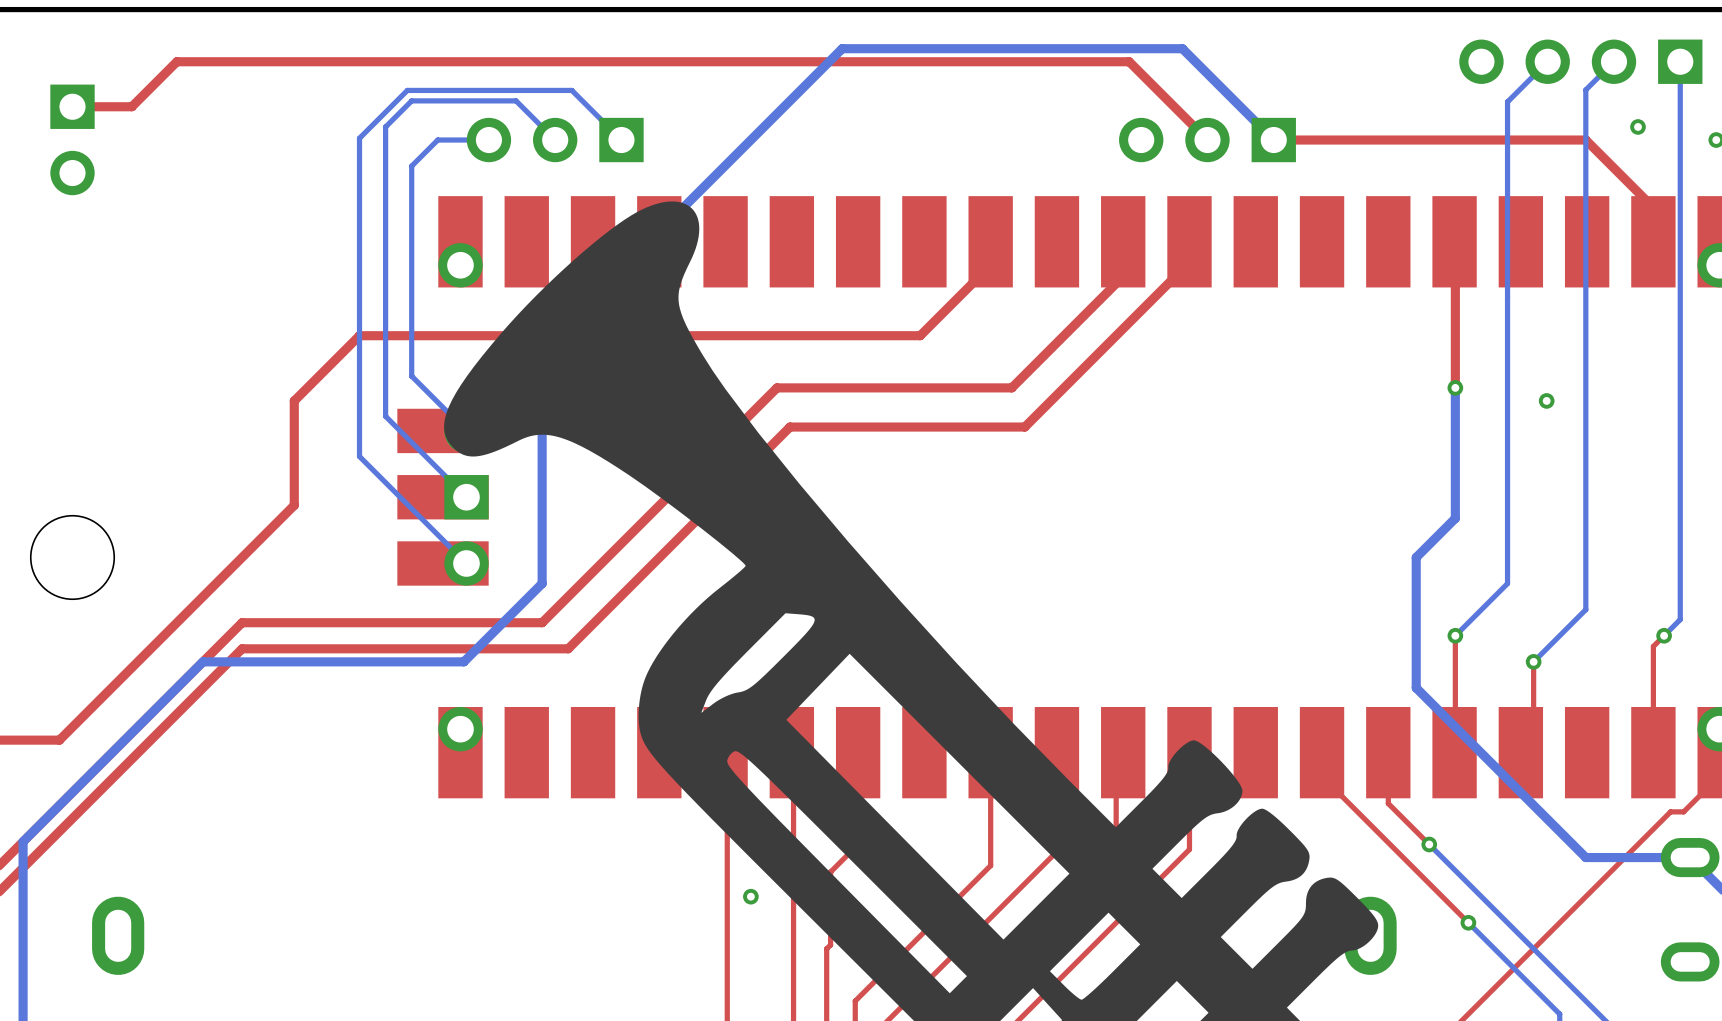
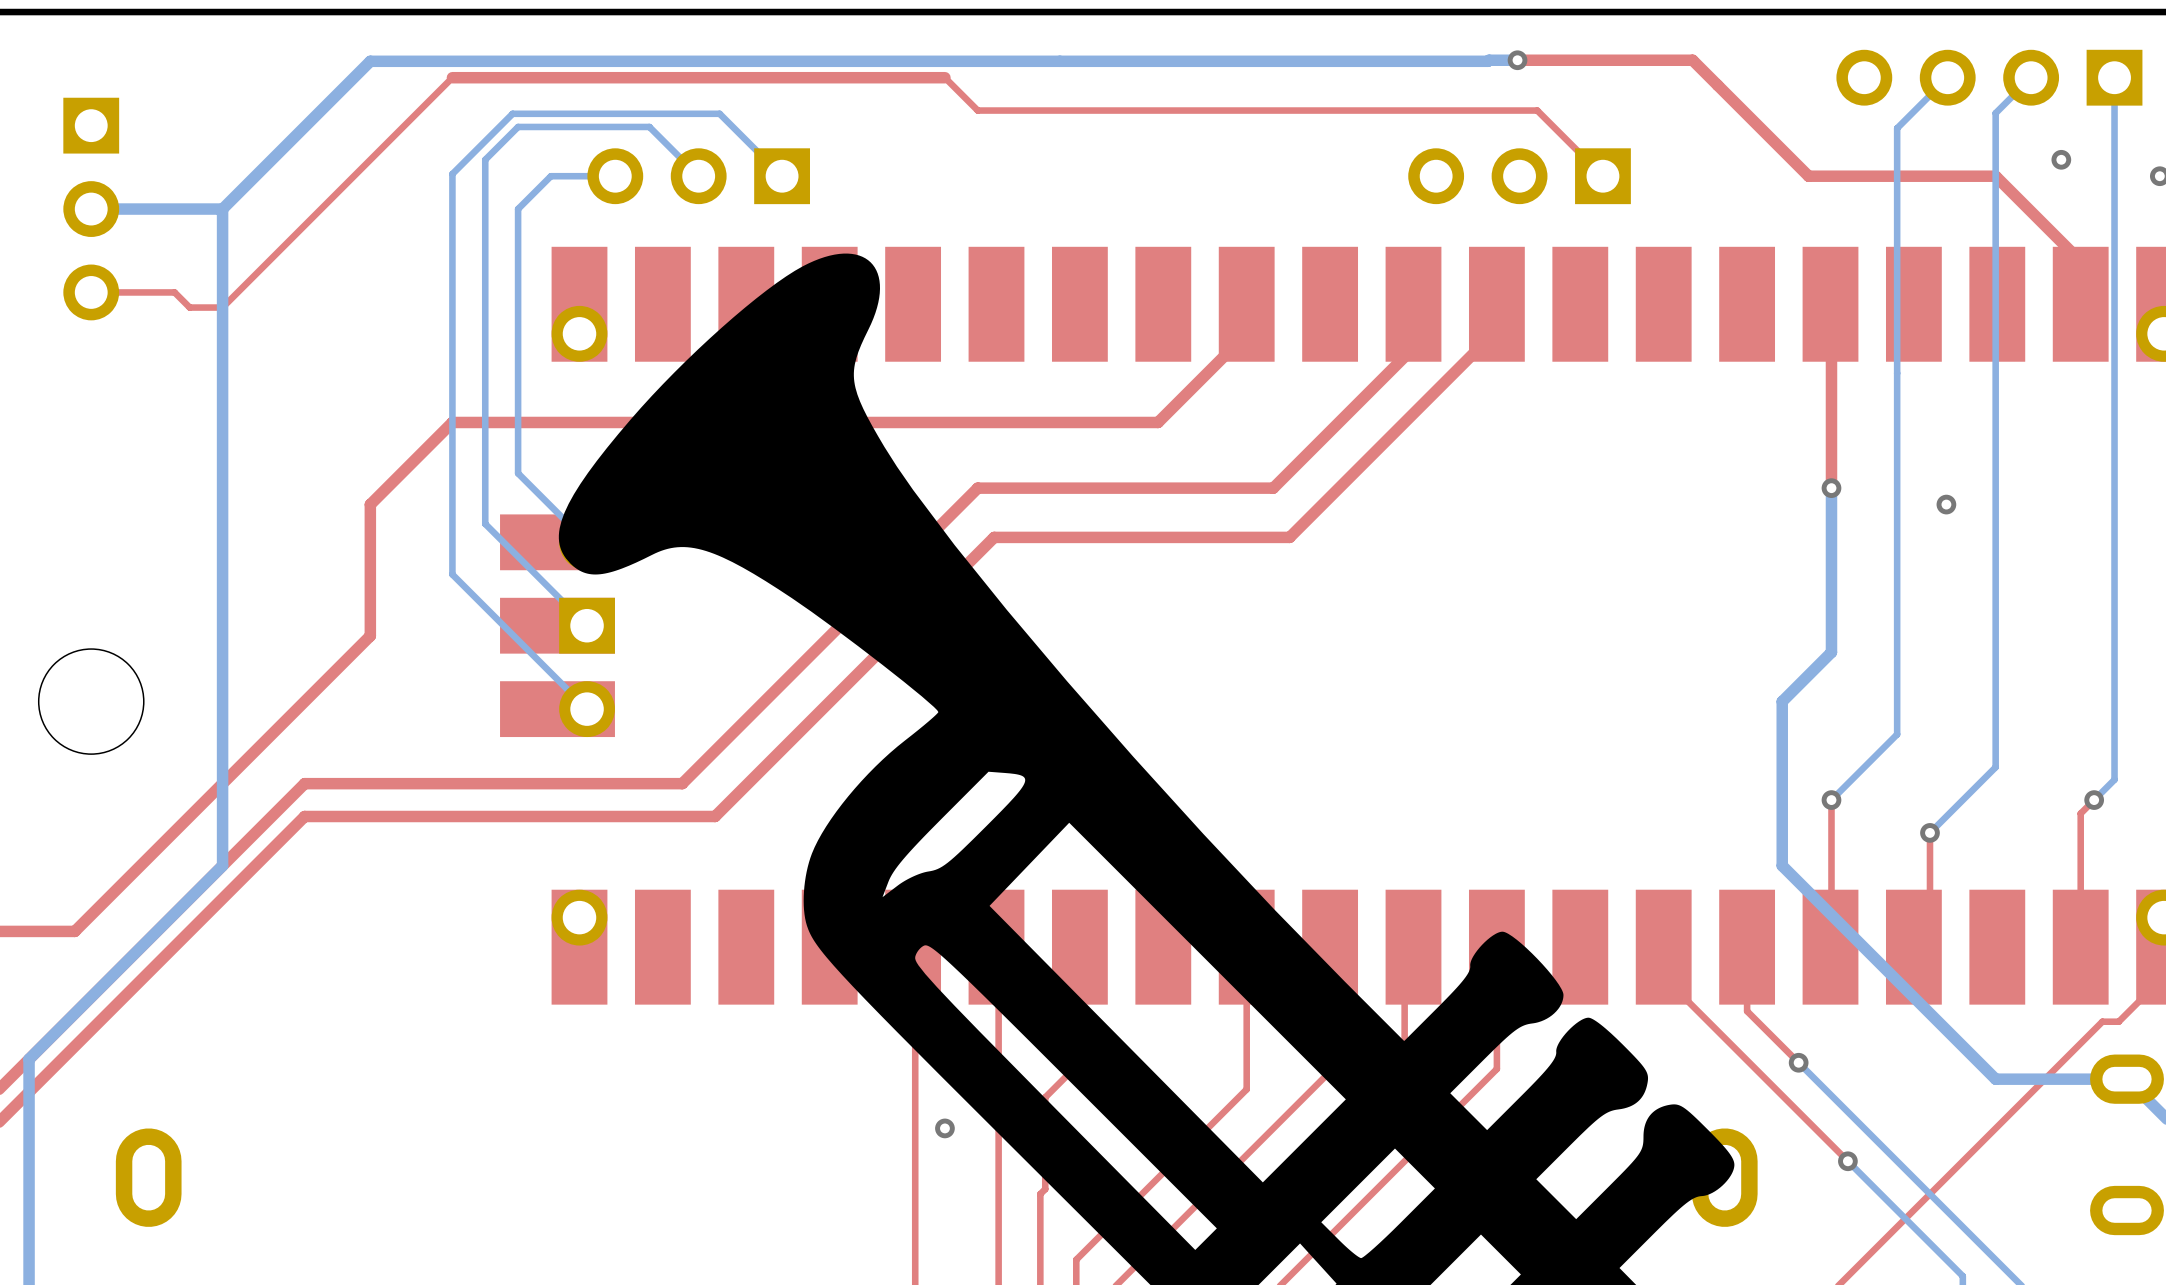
via: none -> (1517, 60)
bottom track: (842, 48) (542, 348) (542, 583) (463, 661) (202, 661) (176, 687) -> (1059, 61) (370, 61) (222, 209)
bottom track: (1182, 48) (1273, 140) -> (1488, 61) (1517, 60)
top track: (359, 61) (176, 61) (131, 106) (72, 106) -> (452, 77) (222, 307) (189, 307) (174, 292) (91, 292)
top track: (750, 61) (1129, 61) (1207, 140) -> (944, 77) (977, 110) (1537, 110) (1602, 176)
part: (72, 139) -> none
top track: (1437, 140) (1273, 140) -> (1808, 176) (1692, 60) (1517, 60)
part: none -> (91, 209)
bottom track: none -> (222, 209) (222, 865)
bottom track: none -> (222, 209) (91, 209)

